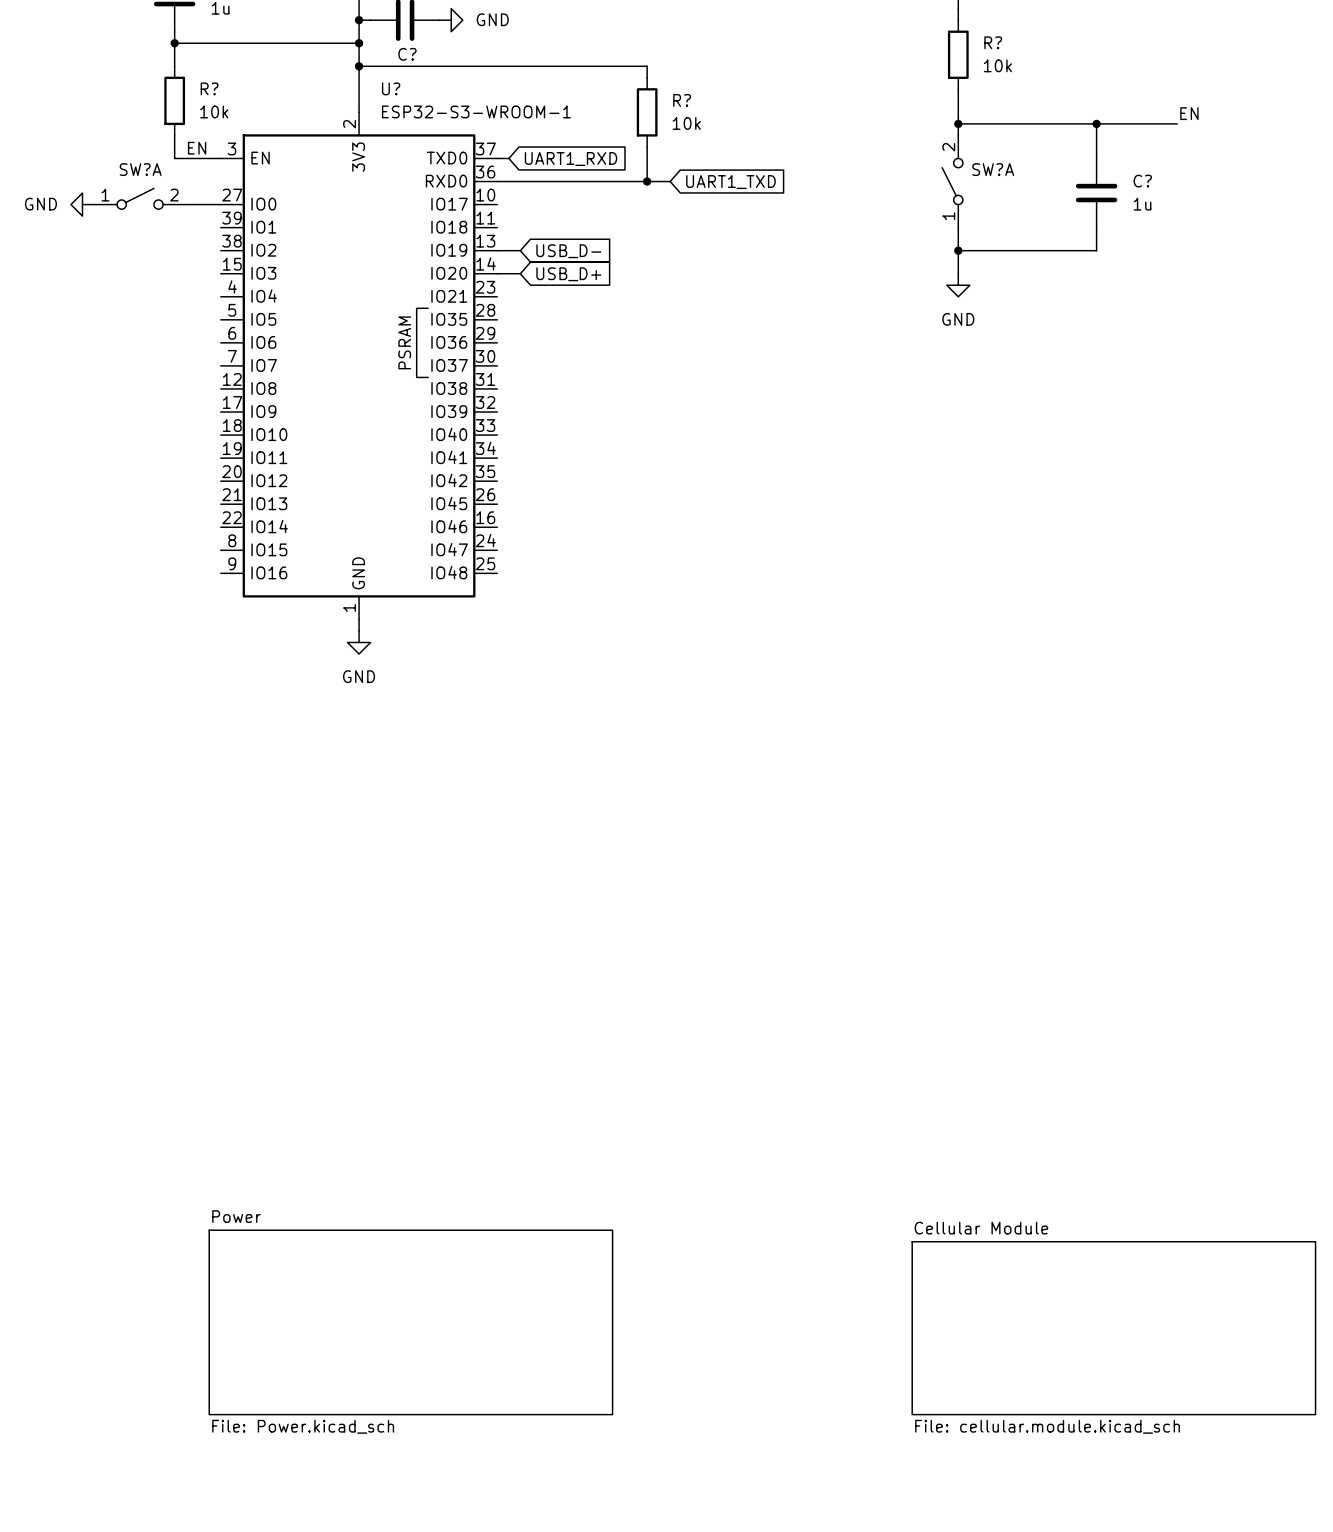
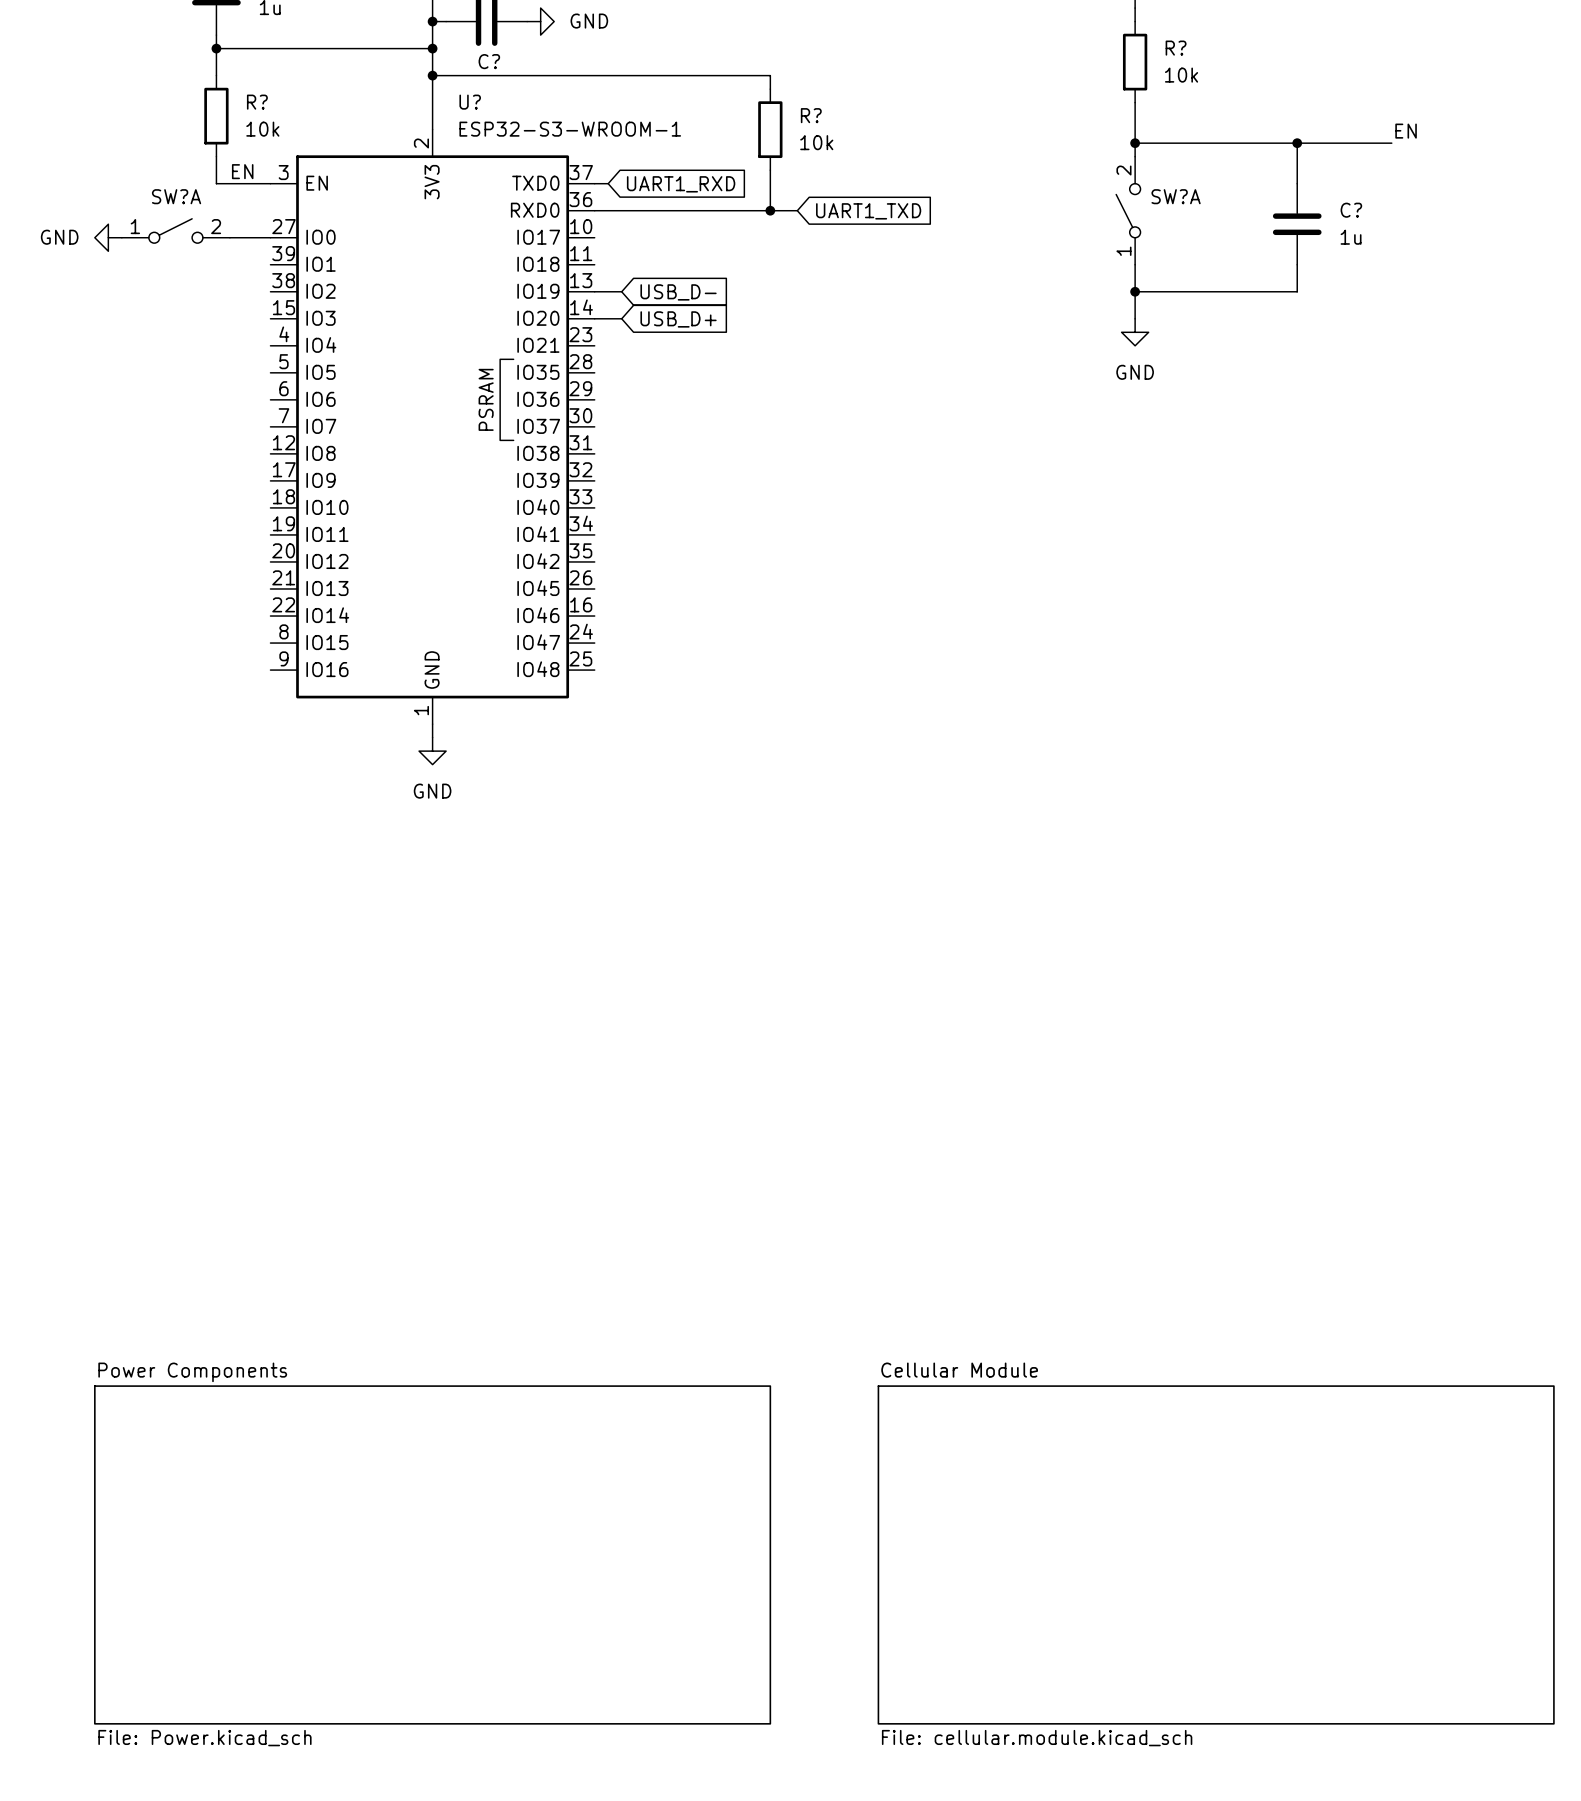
sheet Power: File: Power.kicad_sch (410, 1322) -> none
sheet Power Components: none -> File: Power.kicad_sch (432, 1554)
sheet Cellular Module: none -> File: cellular.module.kicad_sch (1216, 1554)
sheet Cellular Module: File: cellular.module.kicad_sch (1113, 1328) -> none

